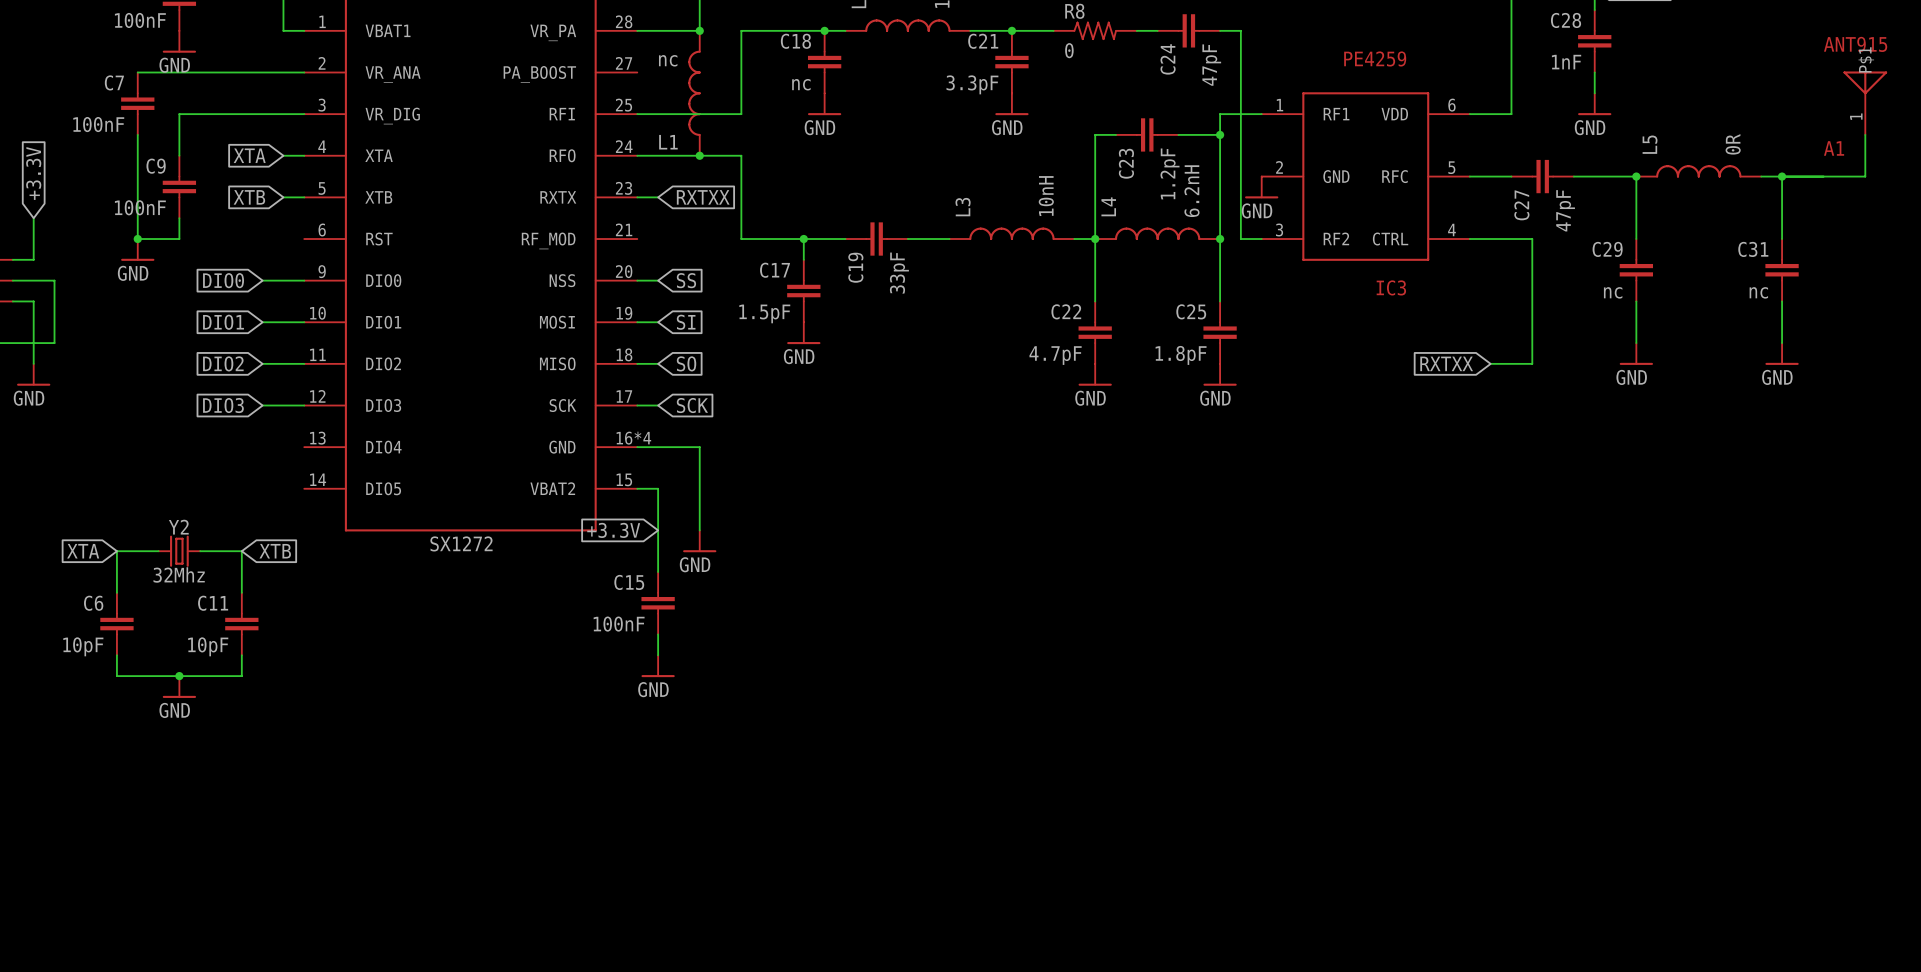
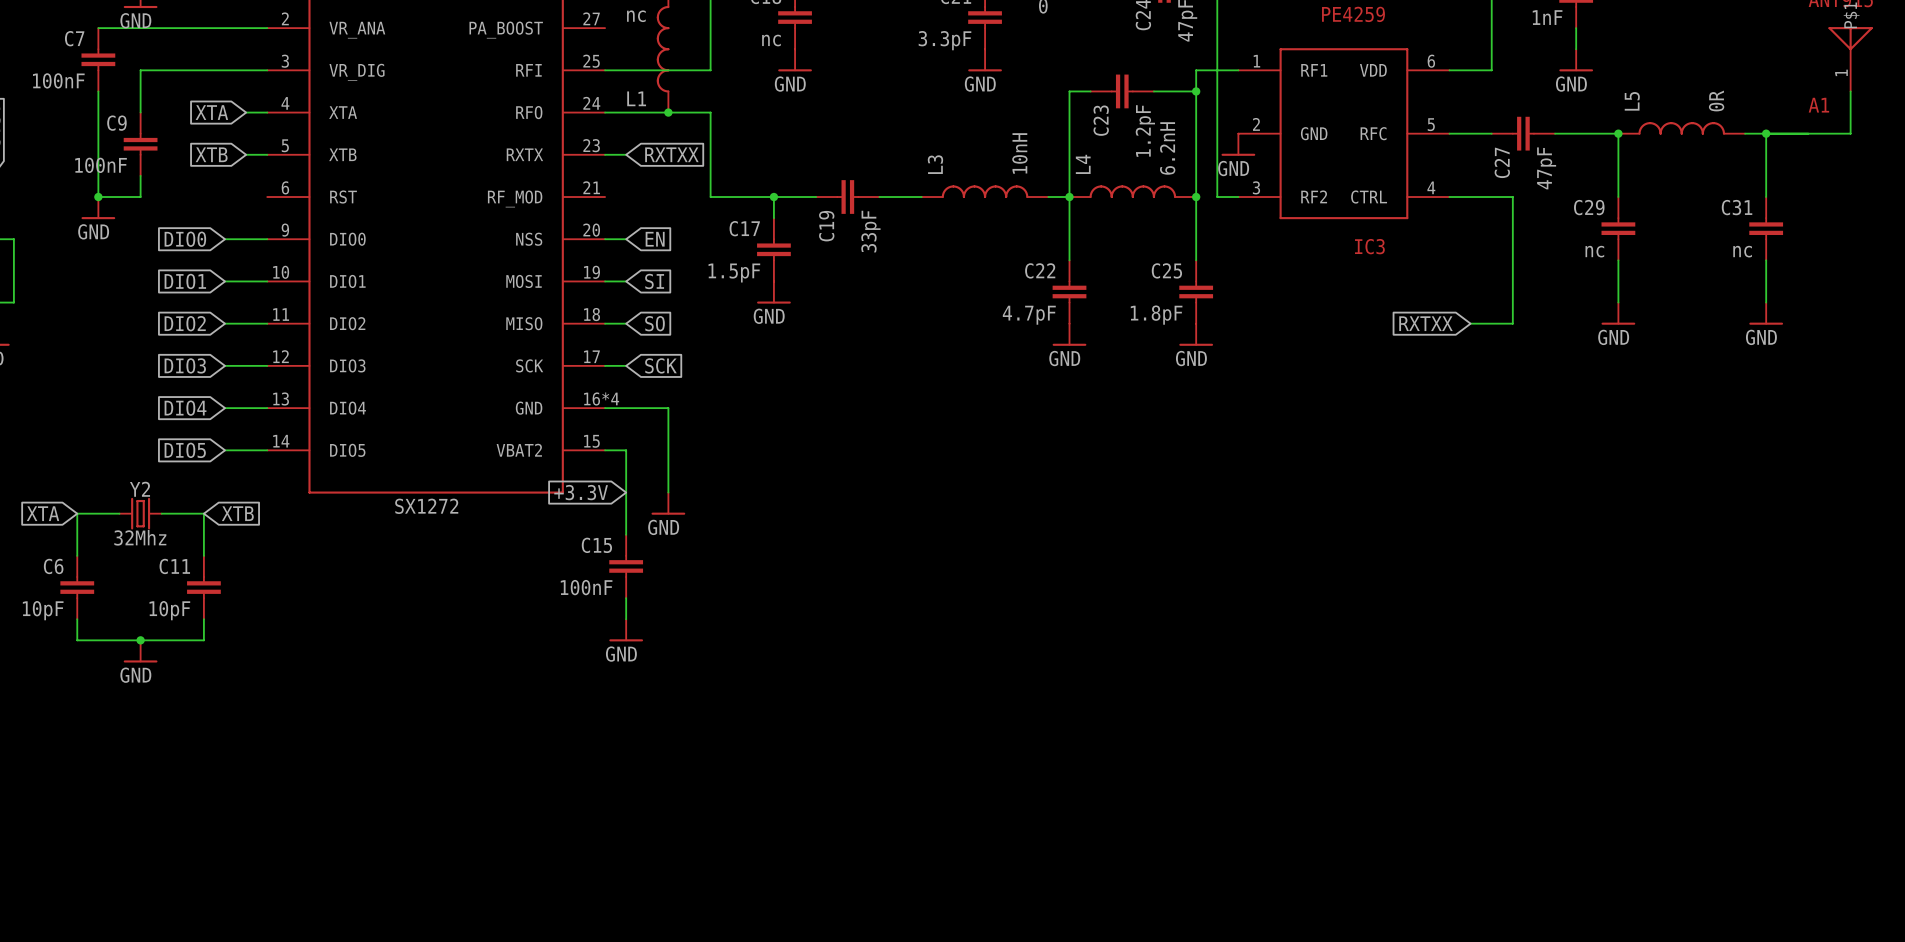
global label: SS (686, 280) -> EN (655, 239)
global label: none -> DIO4 (185, 408)
wire: none -> (225, 408) (267, 408)
global label: none -> DIO5 (185, 450)
wire: none -> (225, 450) (267, 450)

